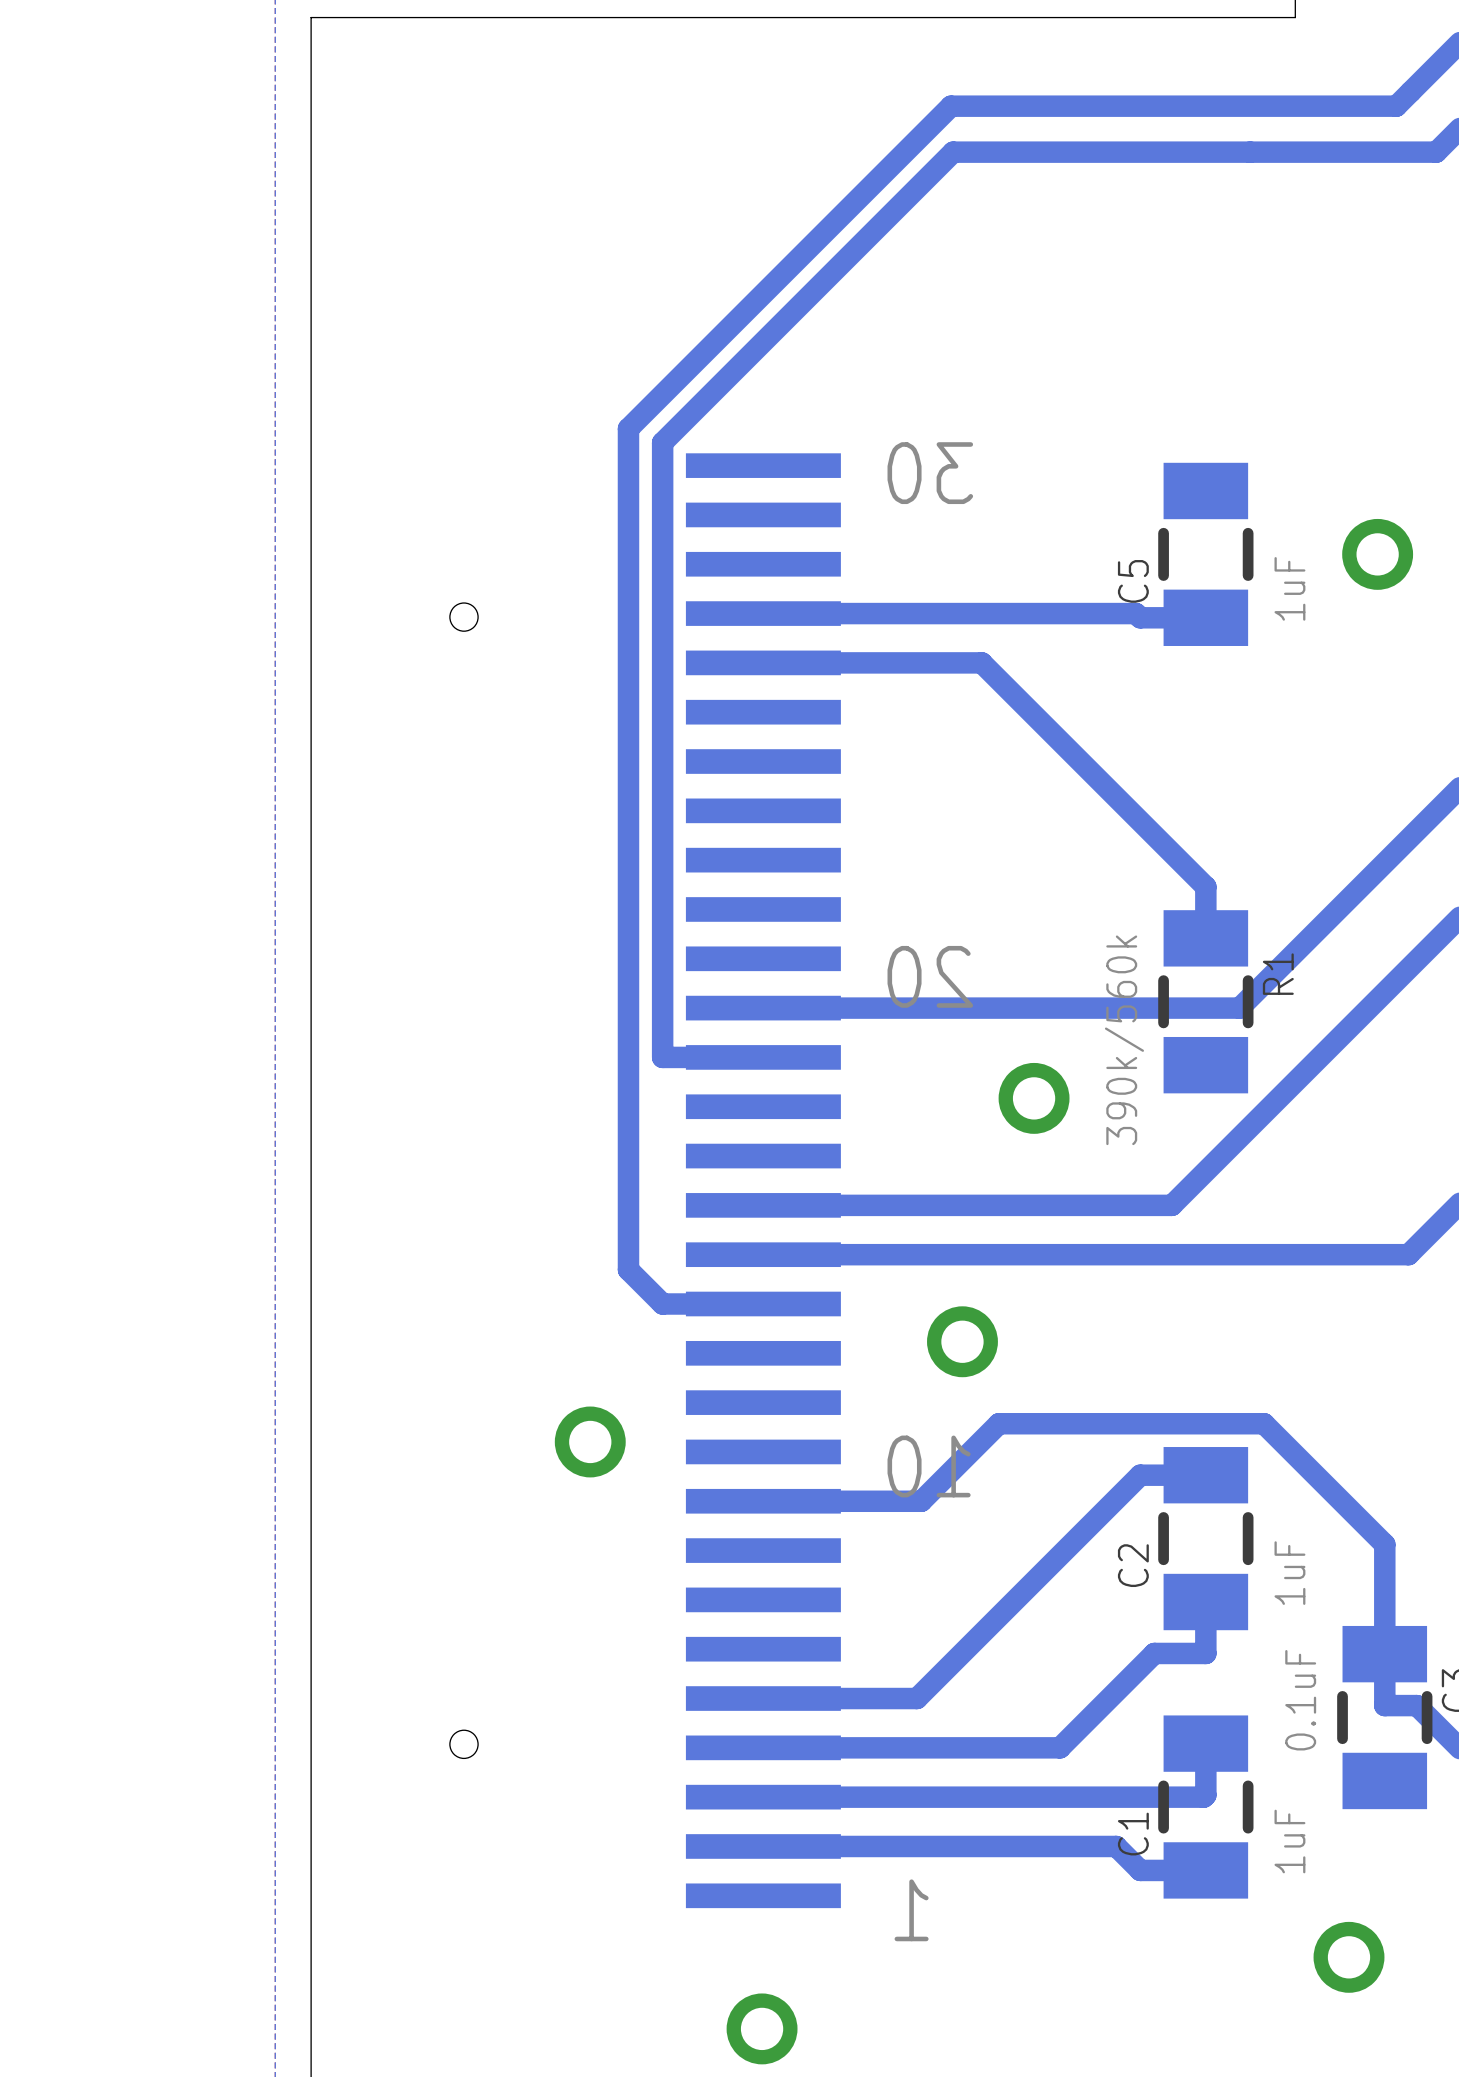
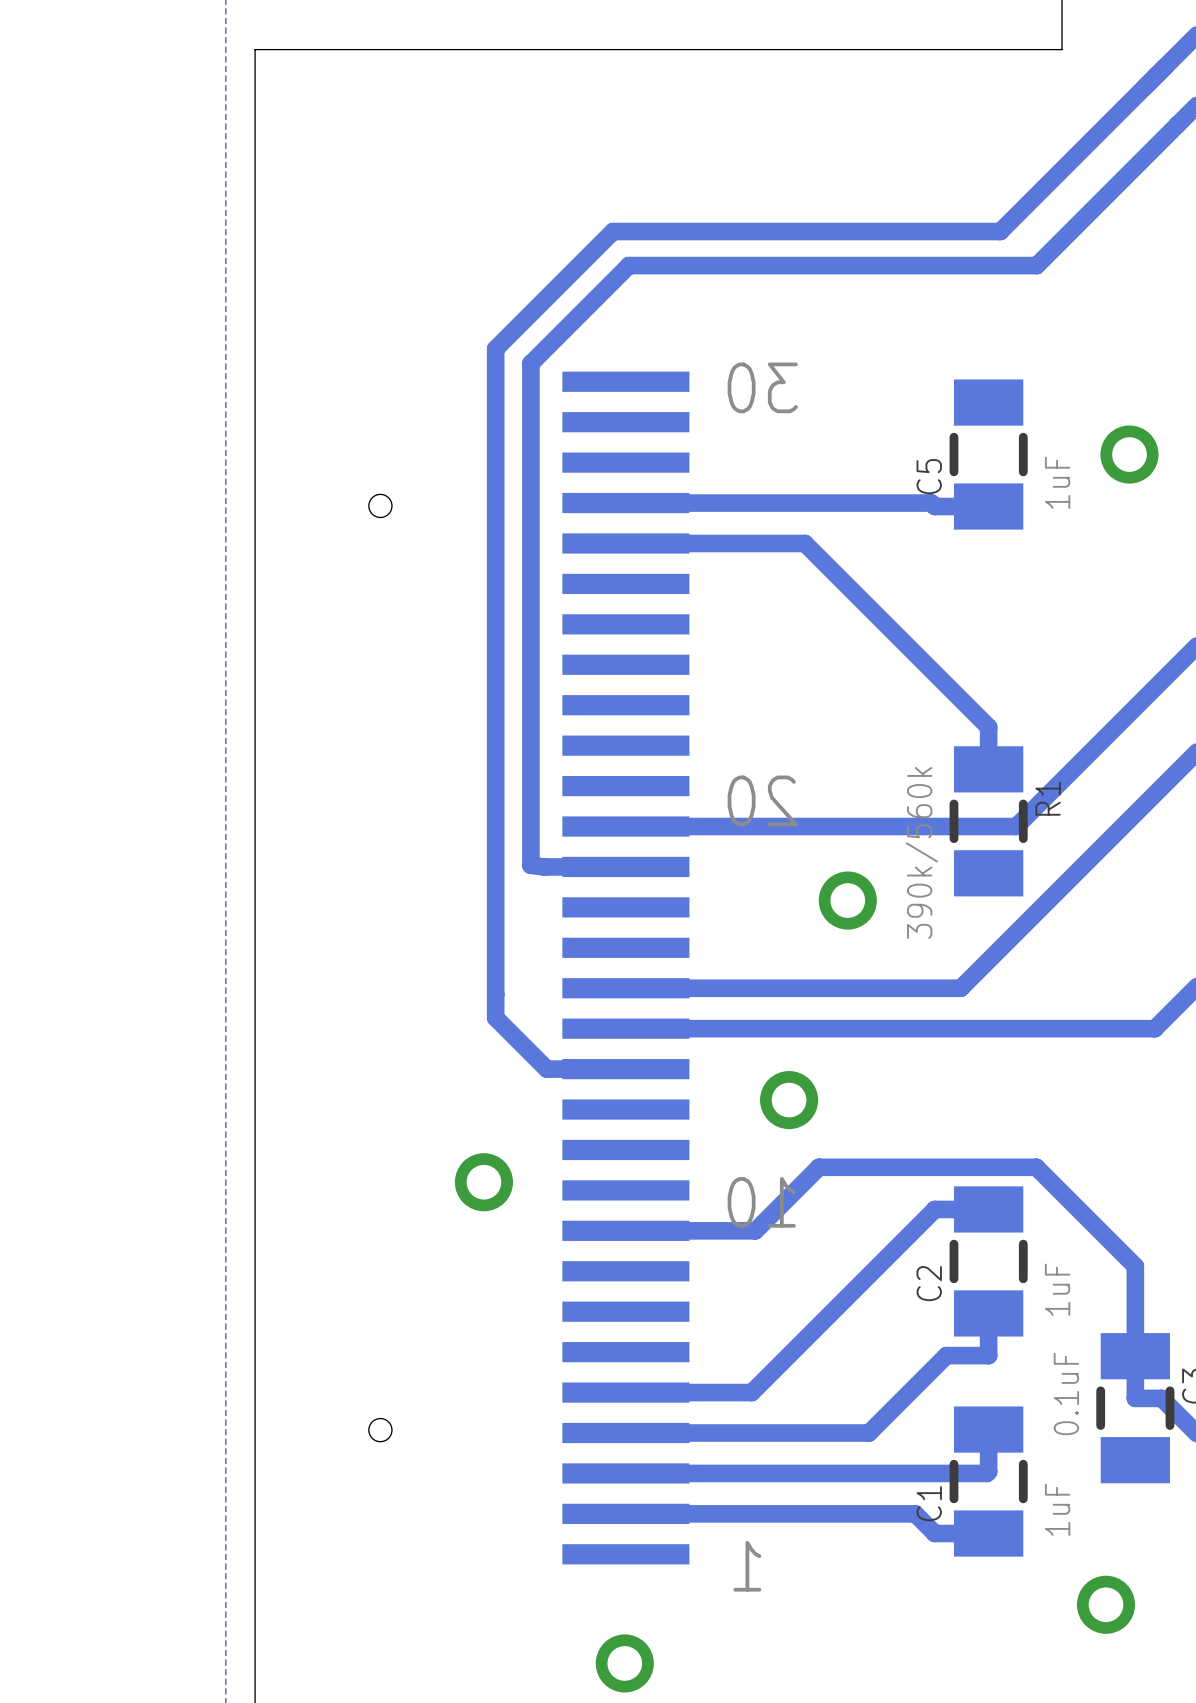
board edge: (1295, 17) (311, 17) (311, 60) -> (1061, 14) (1061, 49) (255, 49)
bottom track: (1396, 106) (951, 106) (628, 428) (628, 1269) (662, 1304) (667, 1304) -> (1144, 87) (1000, 231) (613, 231) (495, 348) (495, 1017) (546, 1069)
bottom track: (1436, 152) (953, 152) (662, 442) (662, 1057) -> (1177, 124) (1036, 265) (628, 265) (530, 363) (530, 865) (544, 866)

